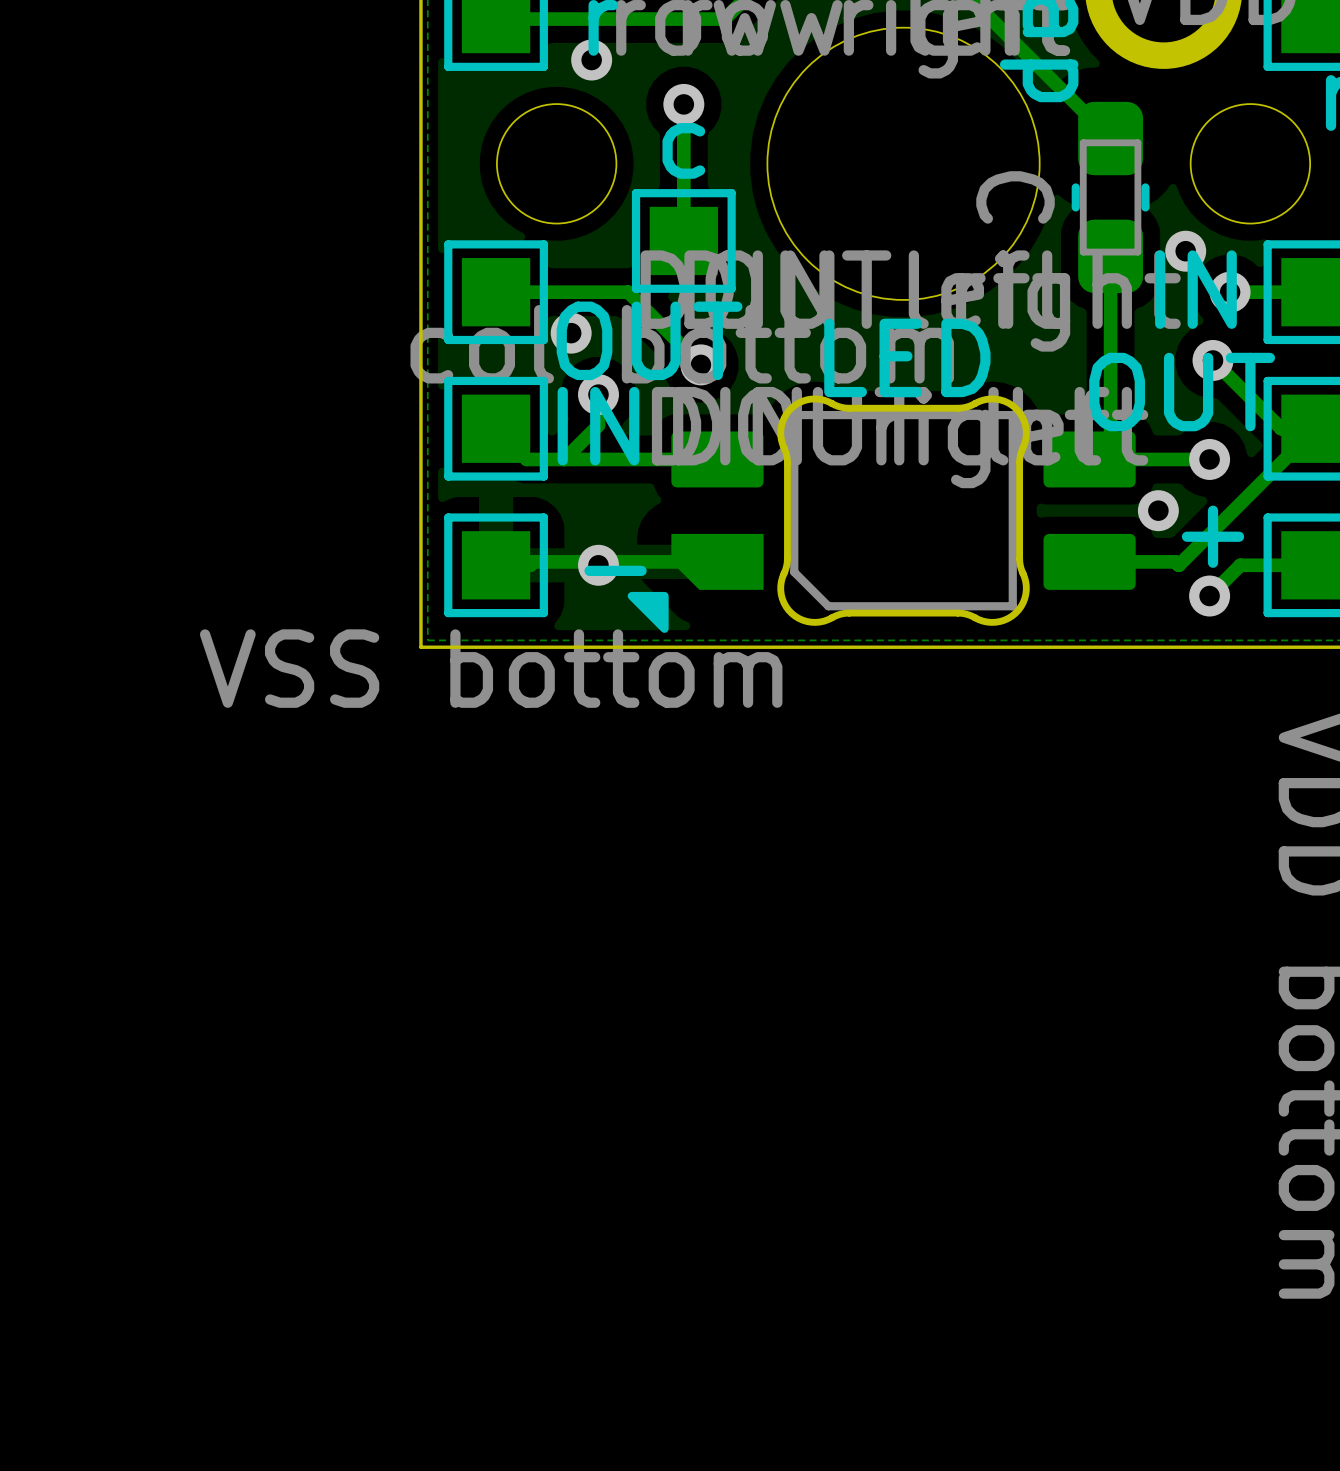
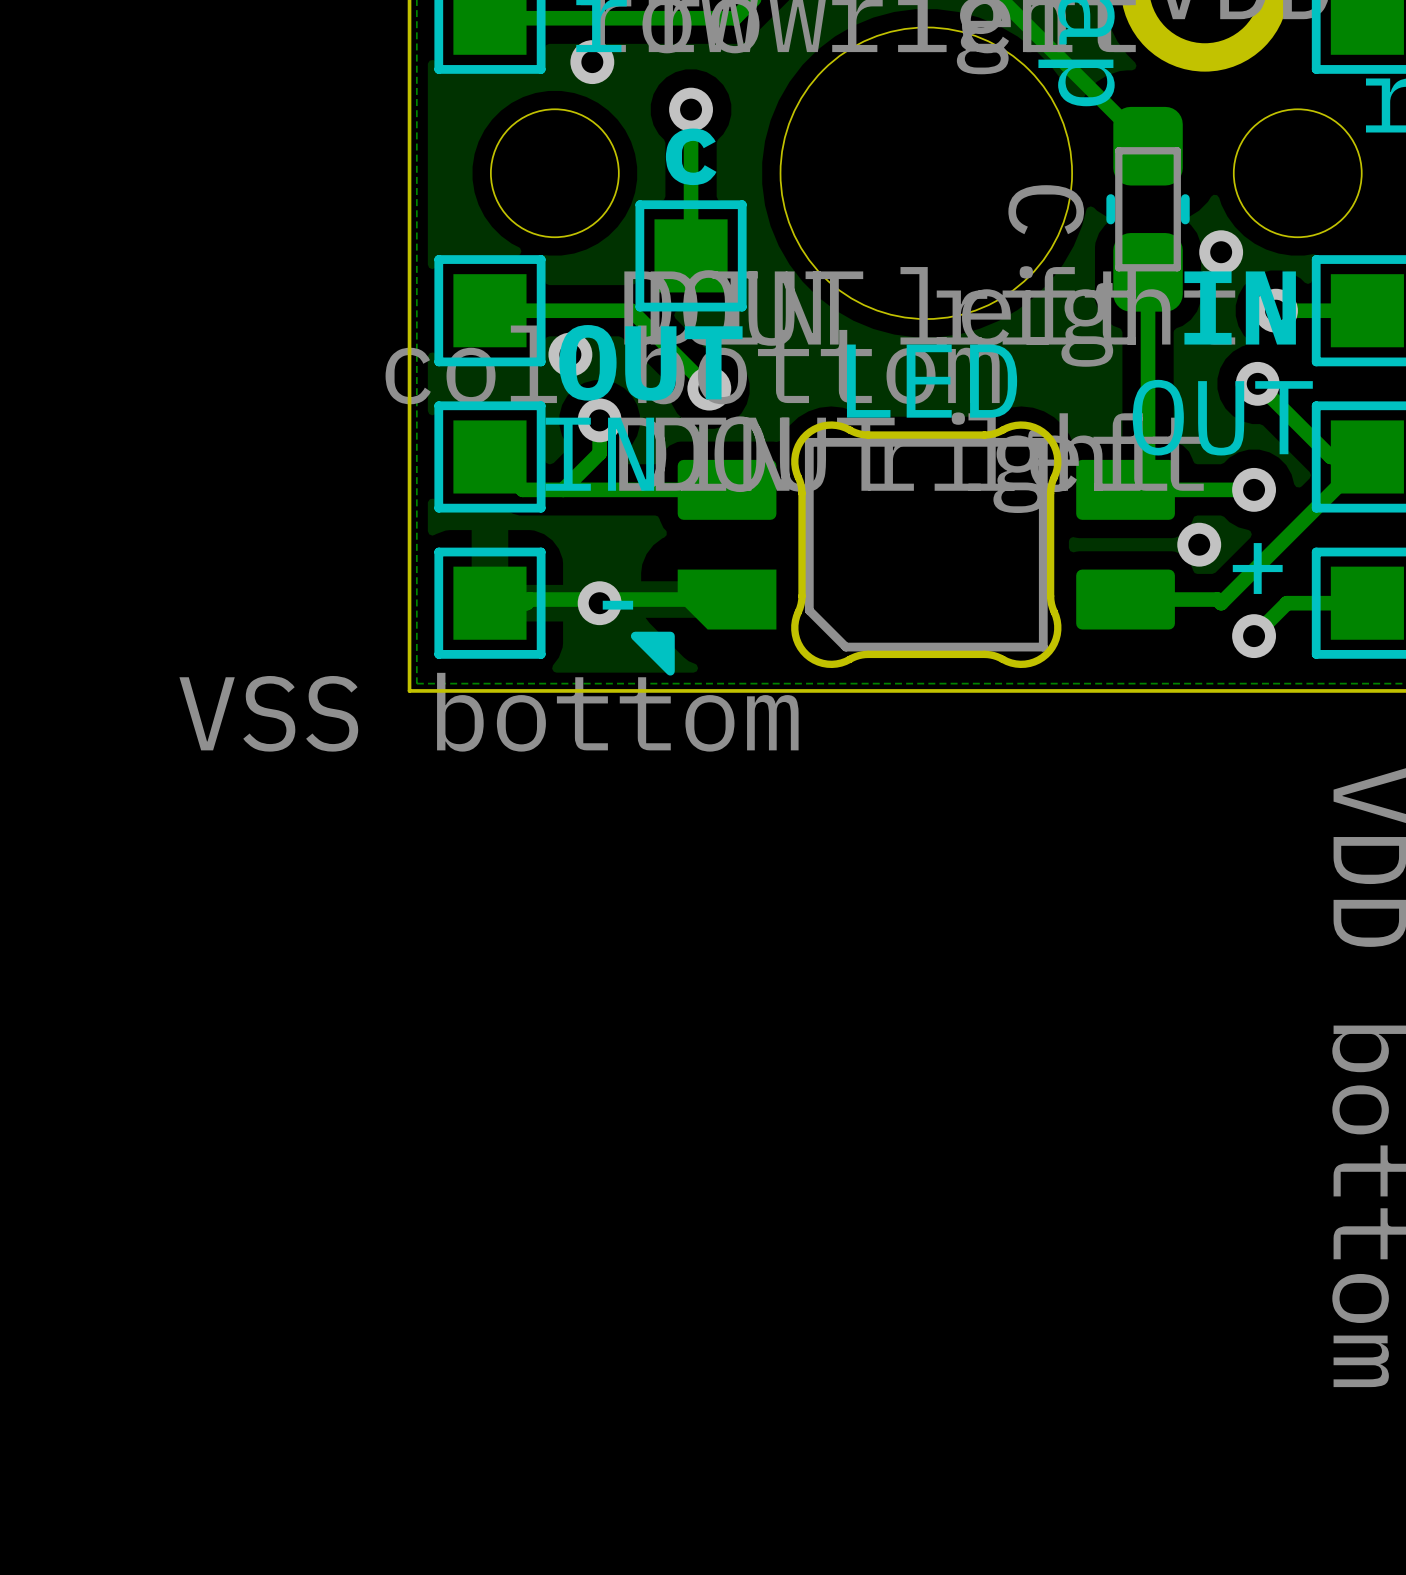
via position: (1185, 251) -> (1221, 252)

